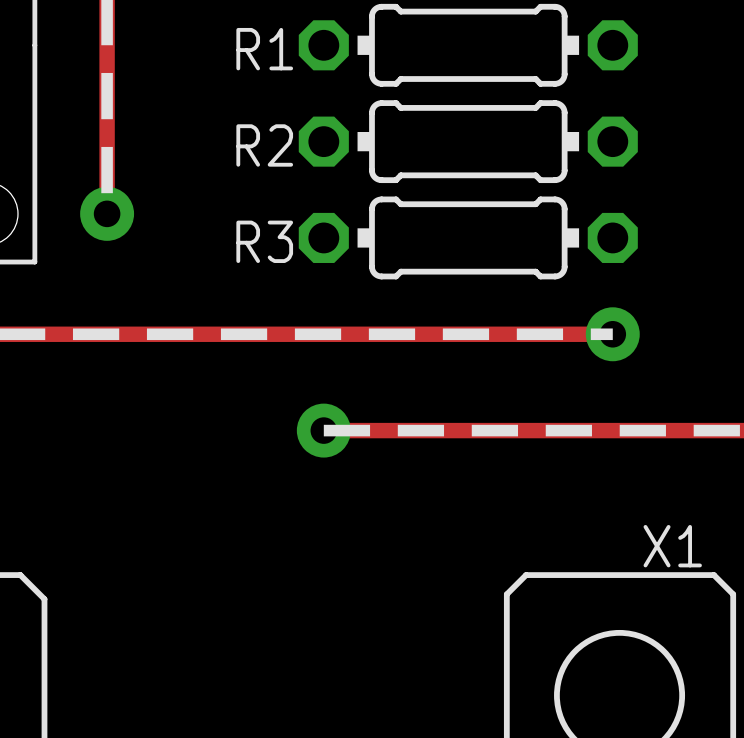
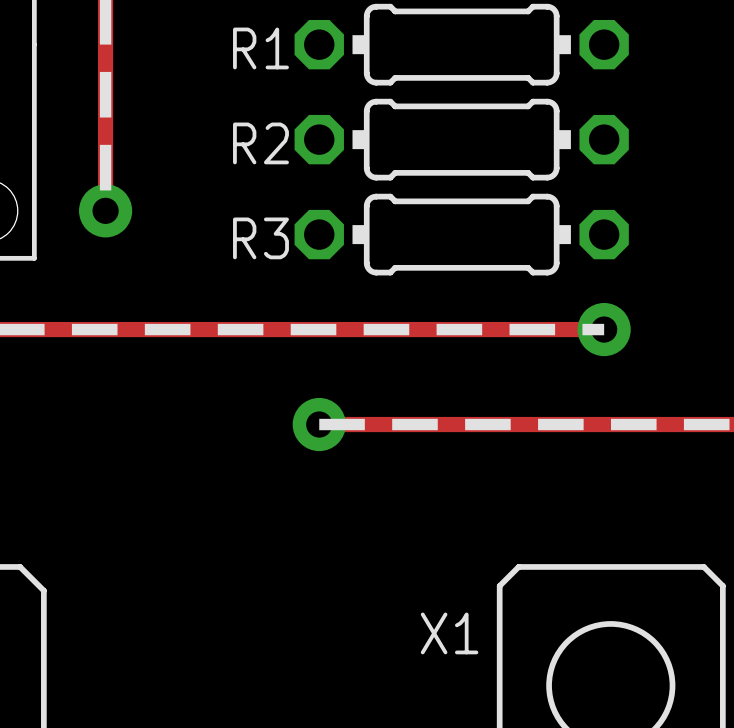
X1 name position: X1 (672, 546) -> X1 (449, 633)

